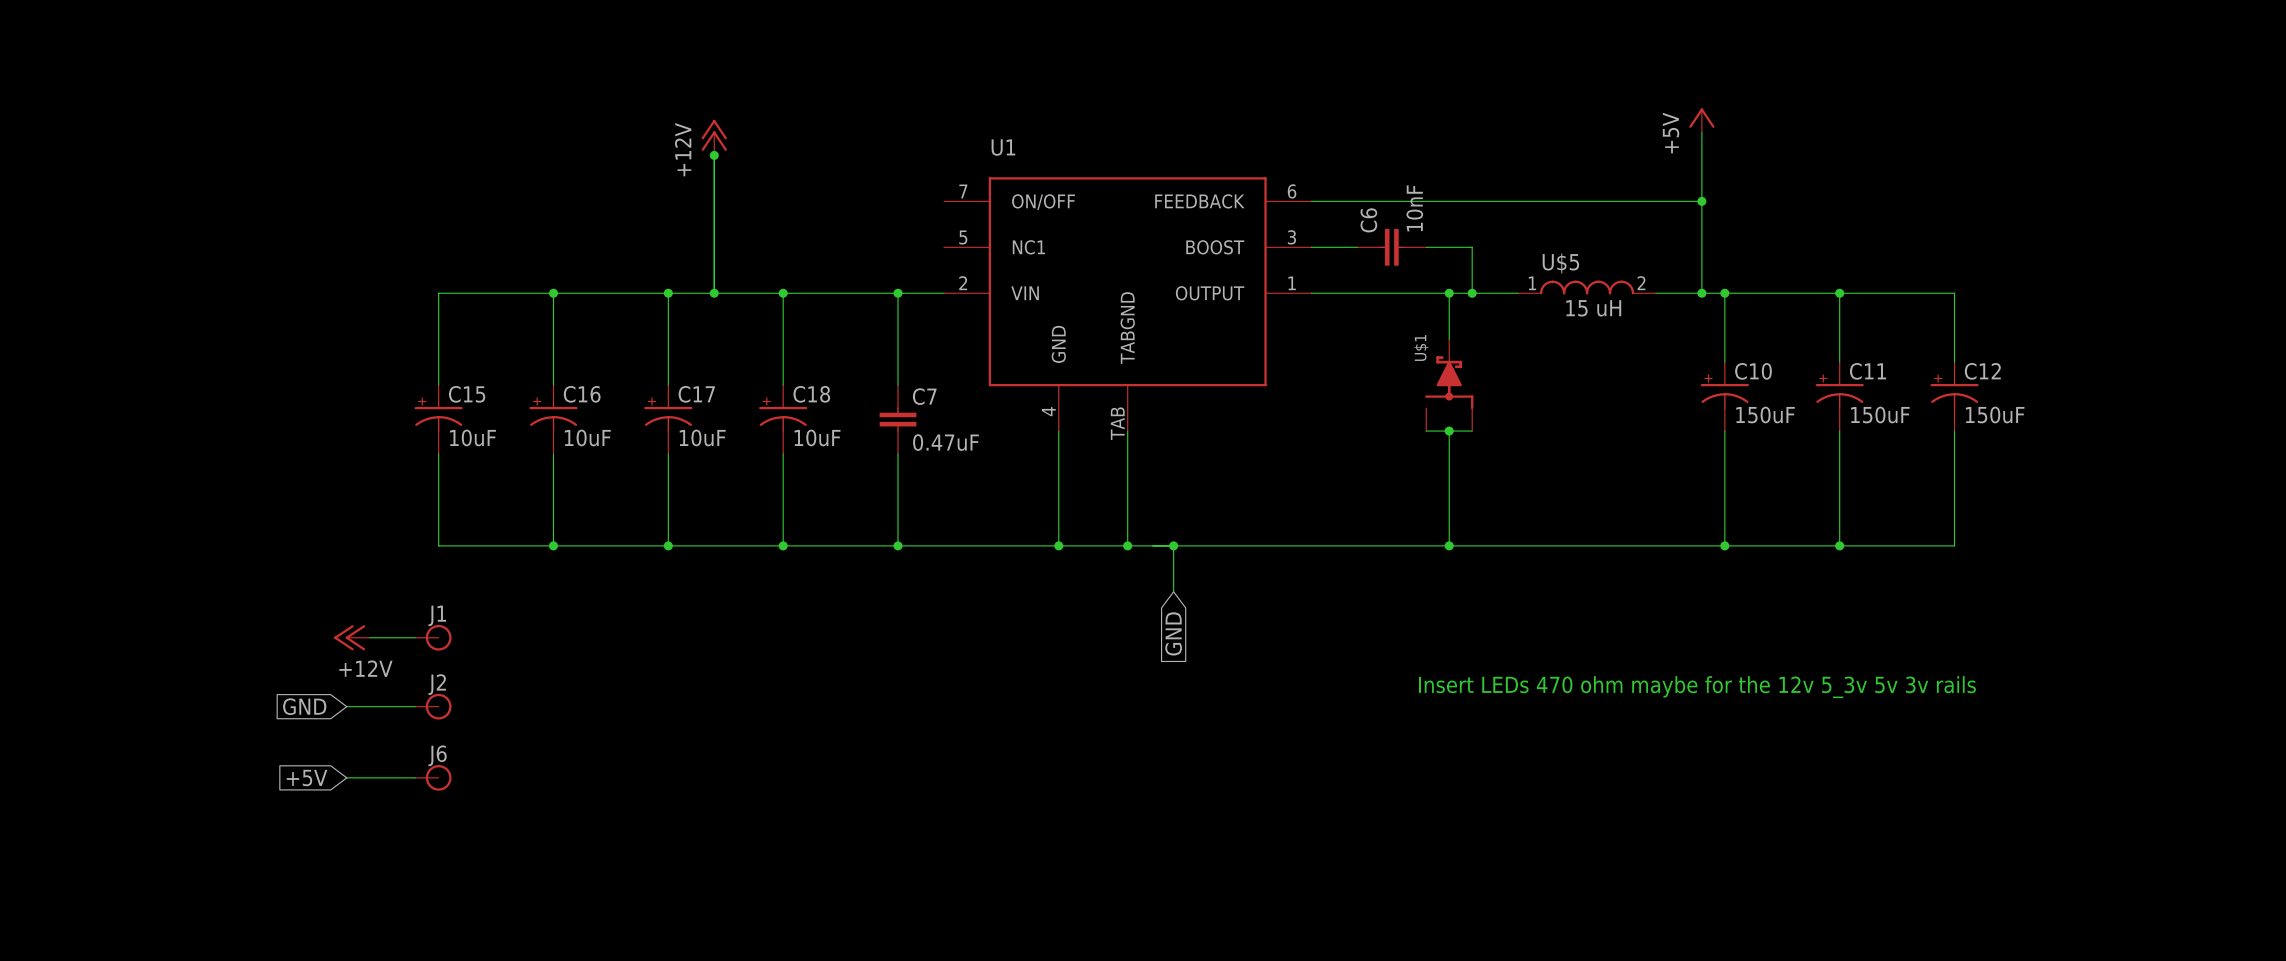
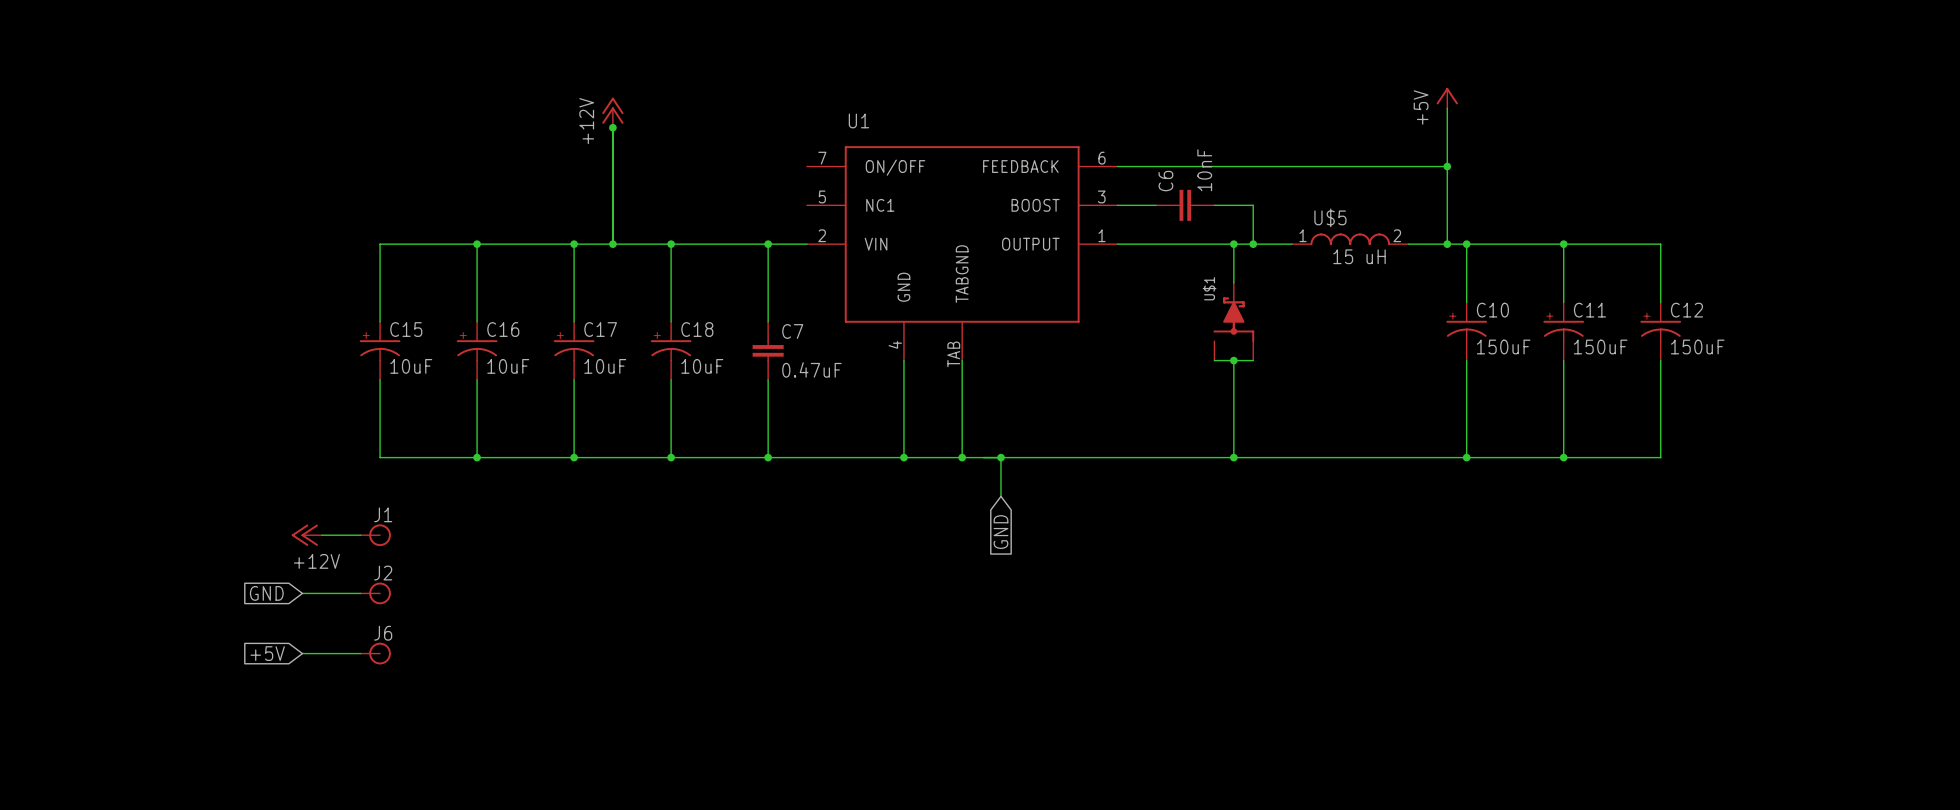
text: Insert LEDs 470 ohm maybe for the 12v 5_3v 5v 3v rails (1697, 687) -> none

